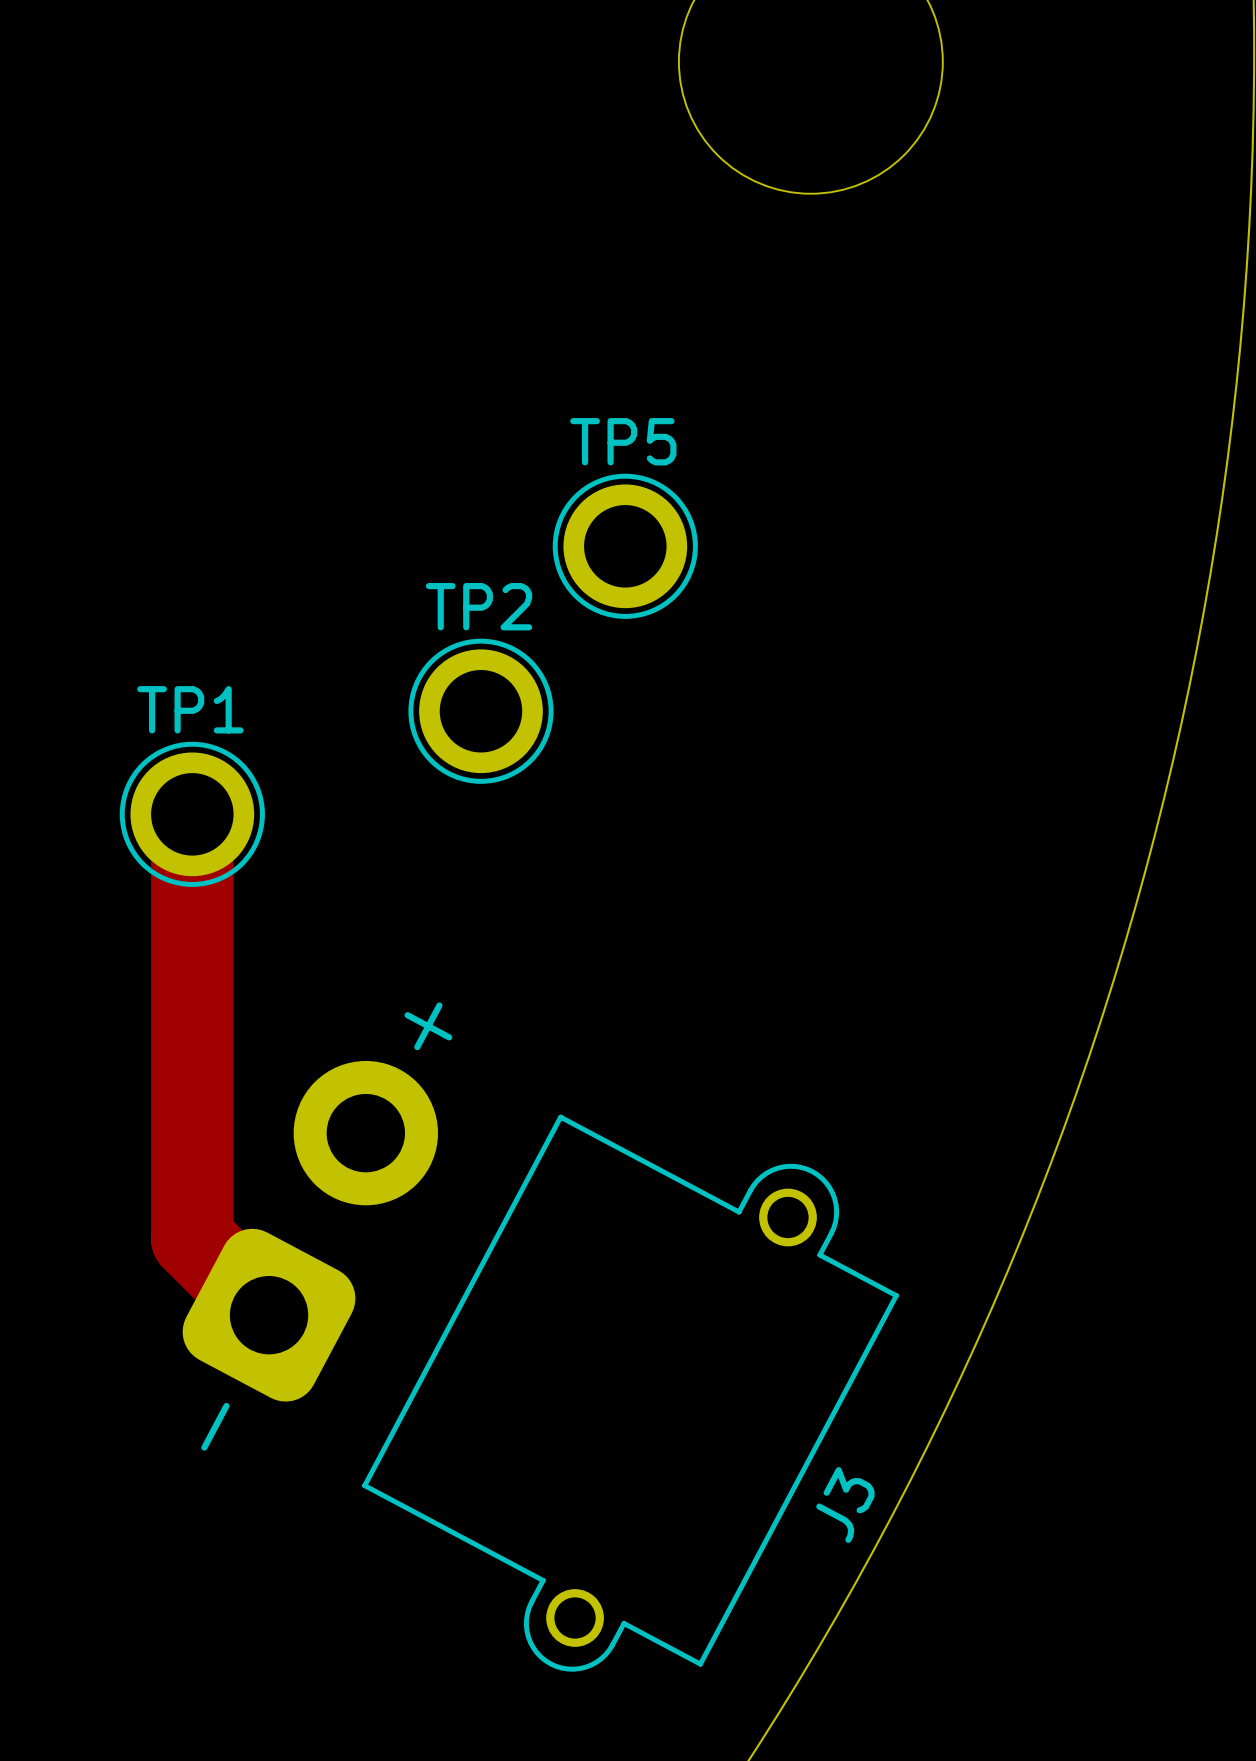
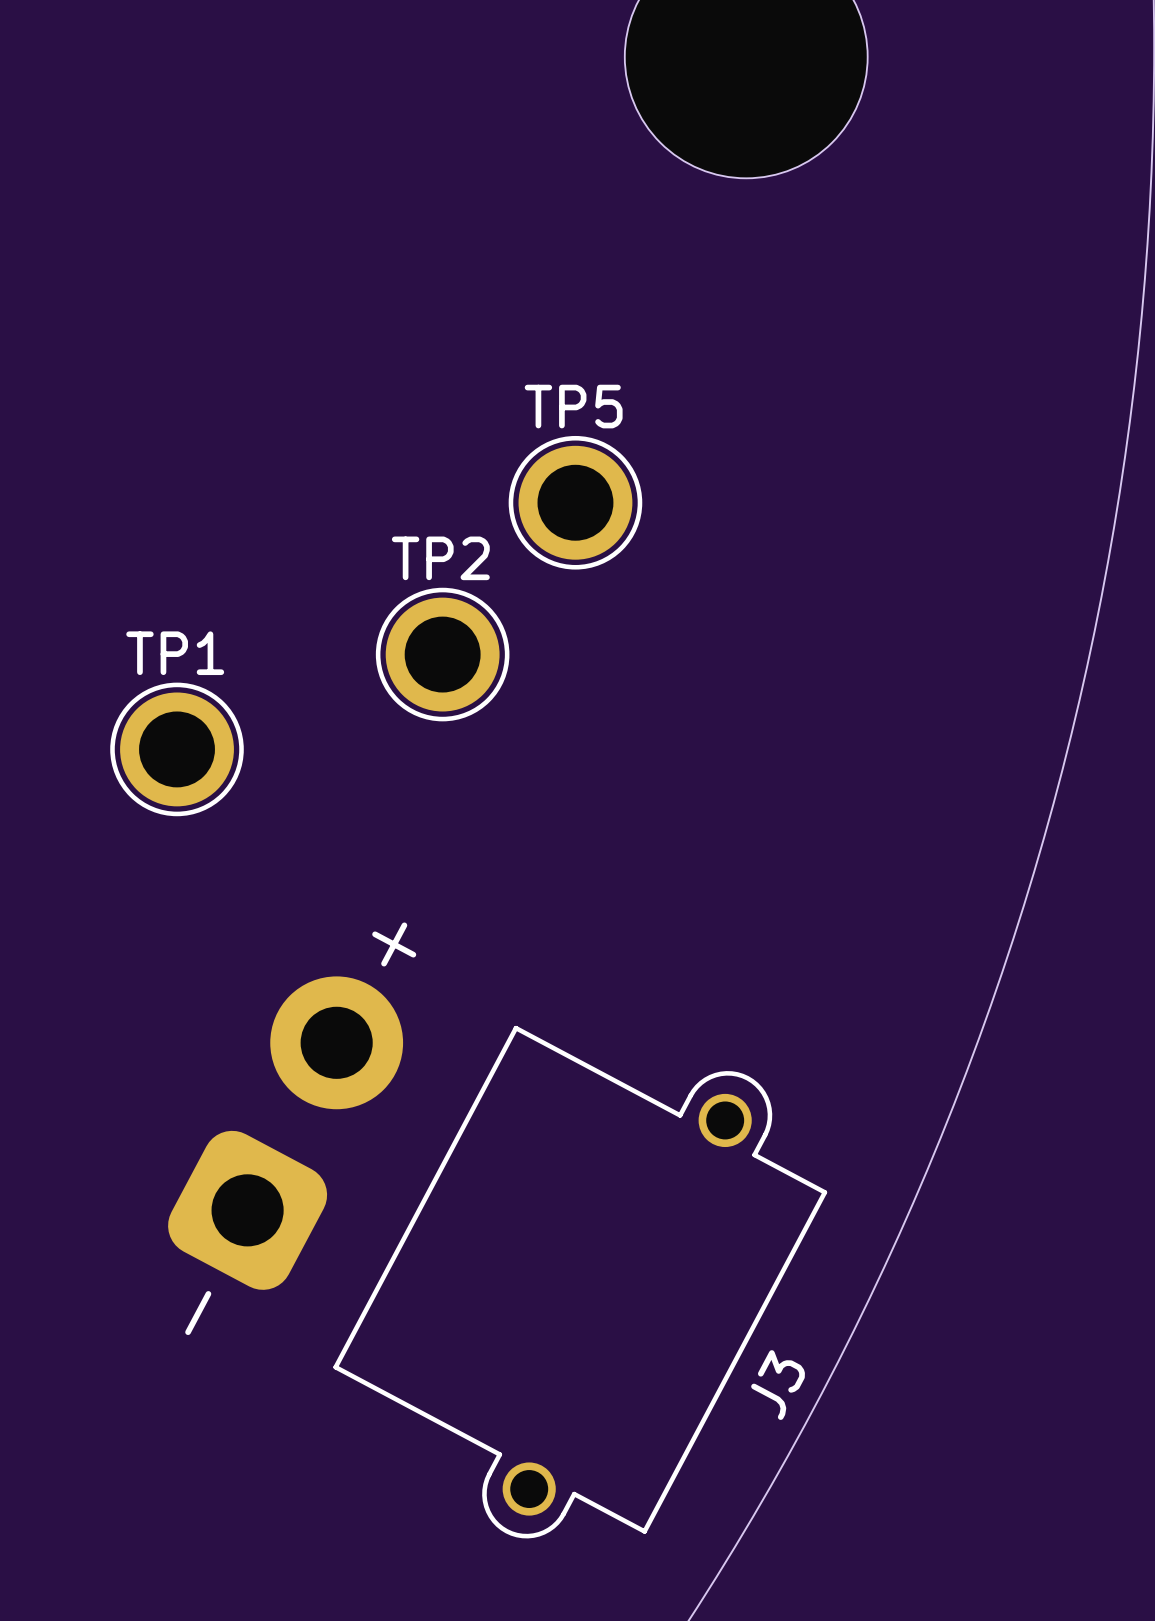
track: (192, 814) (192, 1238) (269, 1315) -> none

